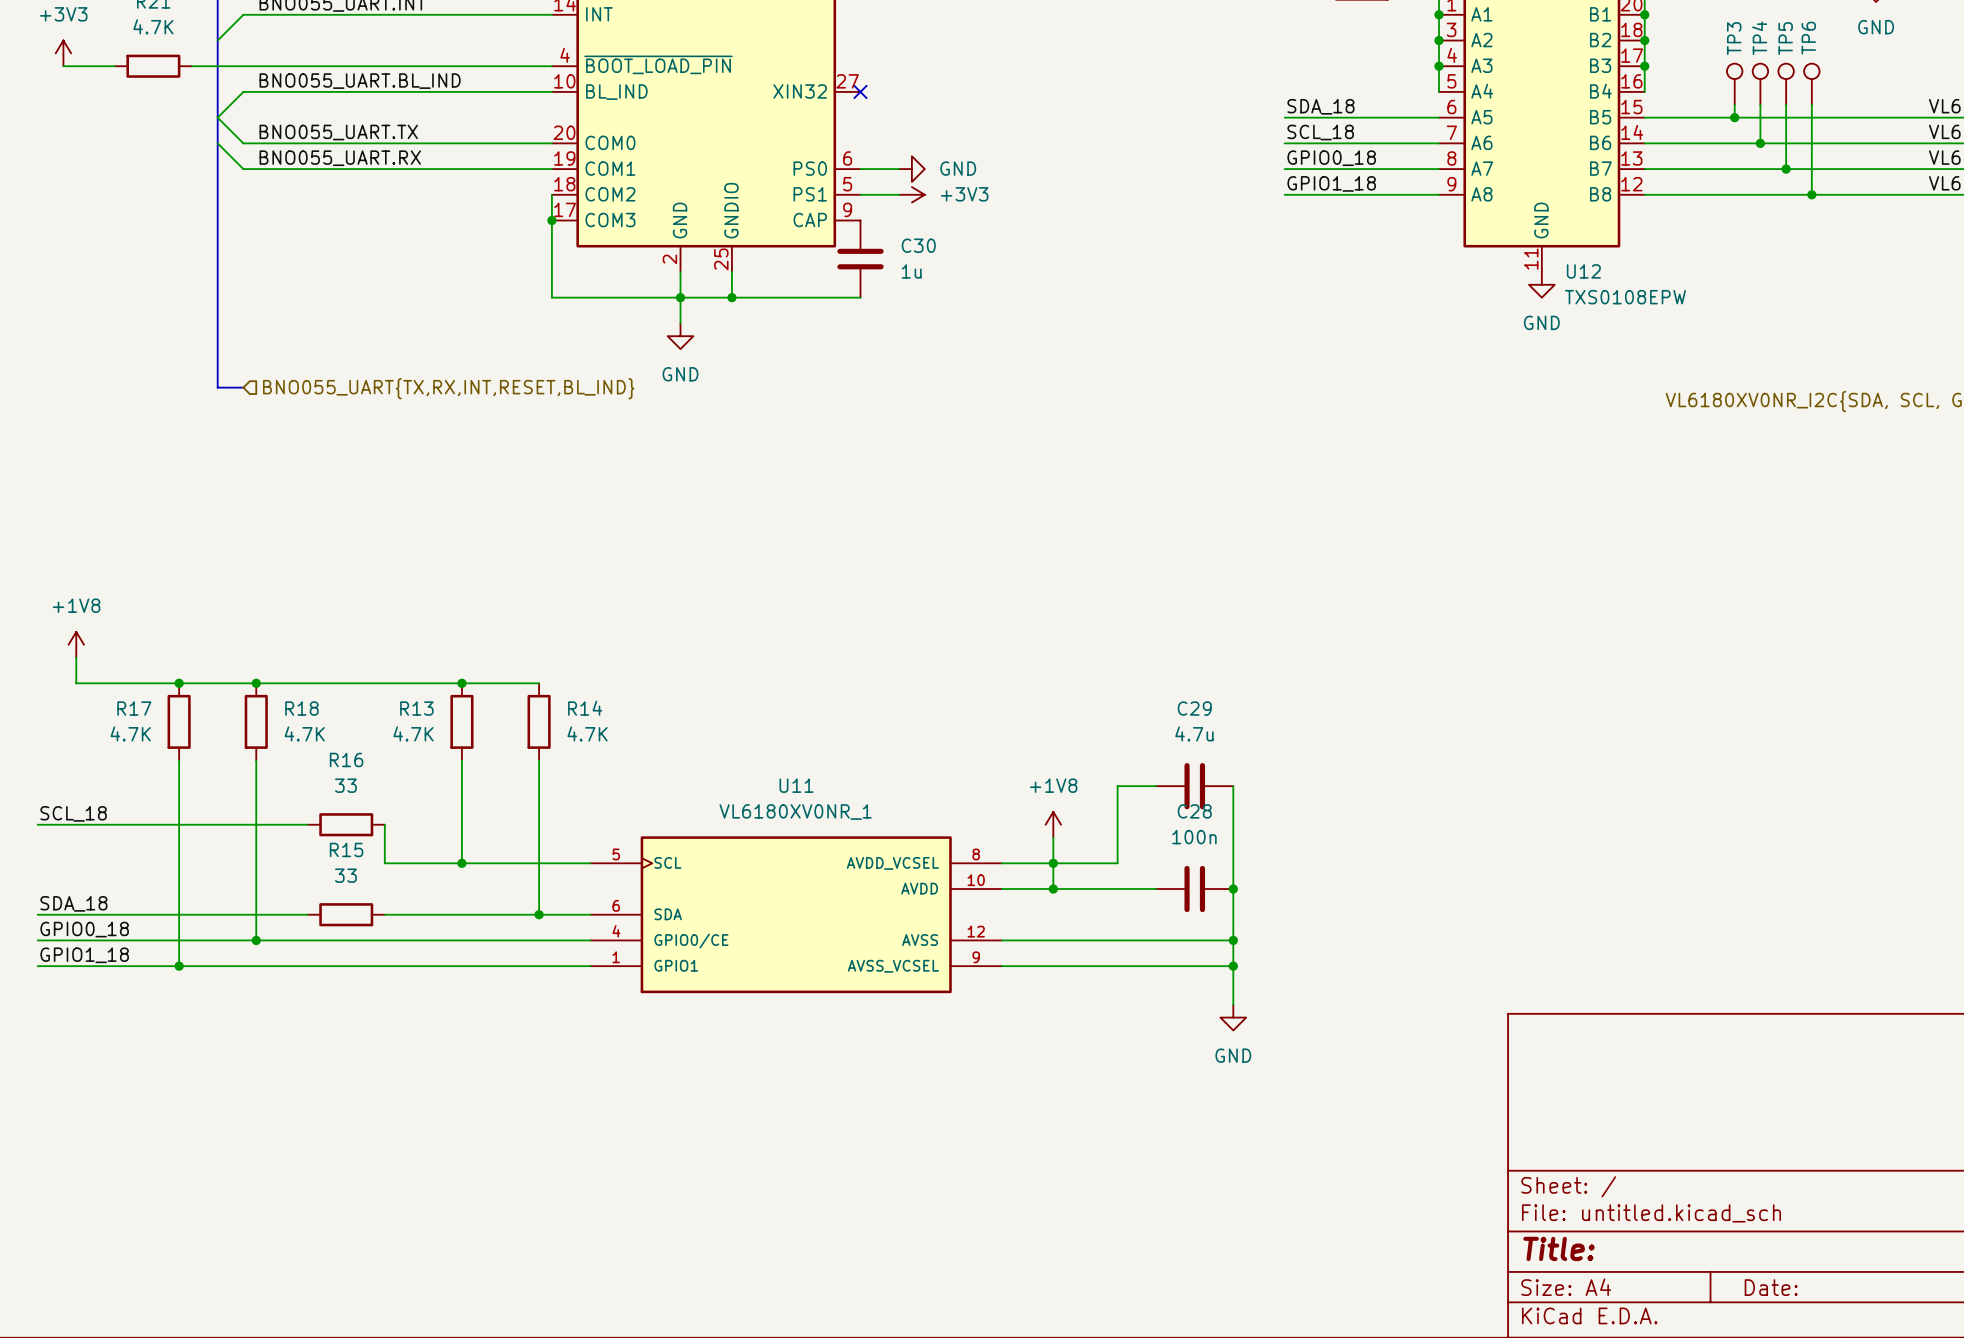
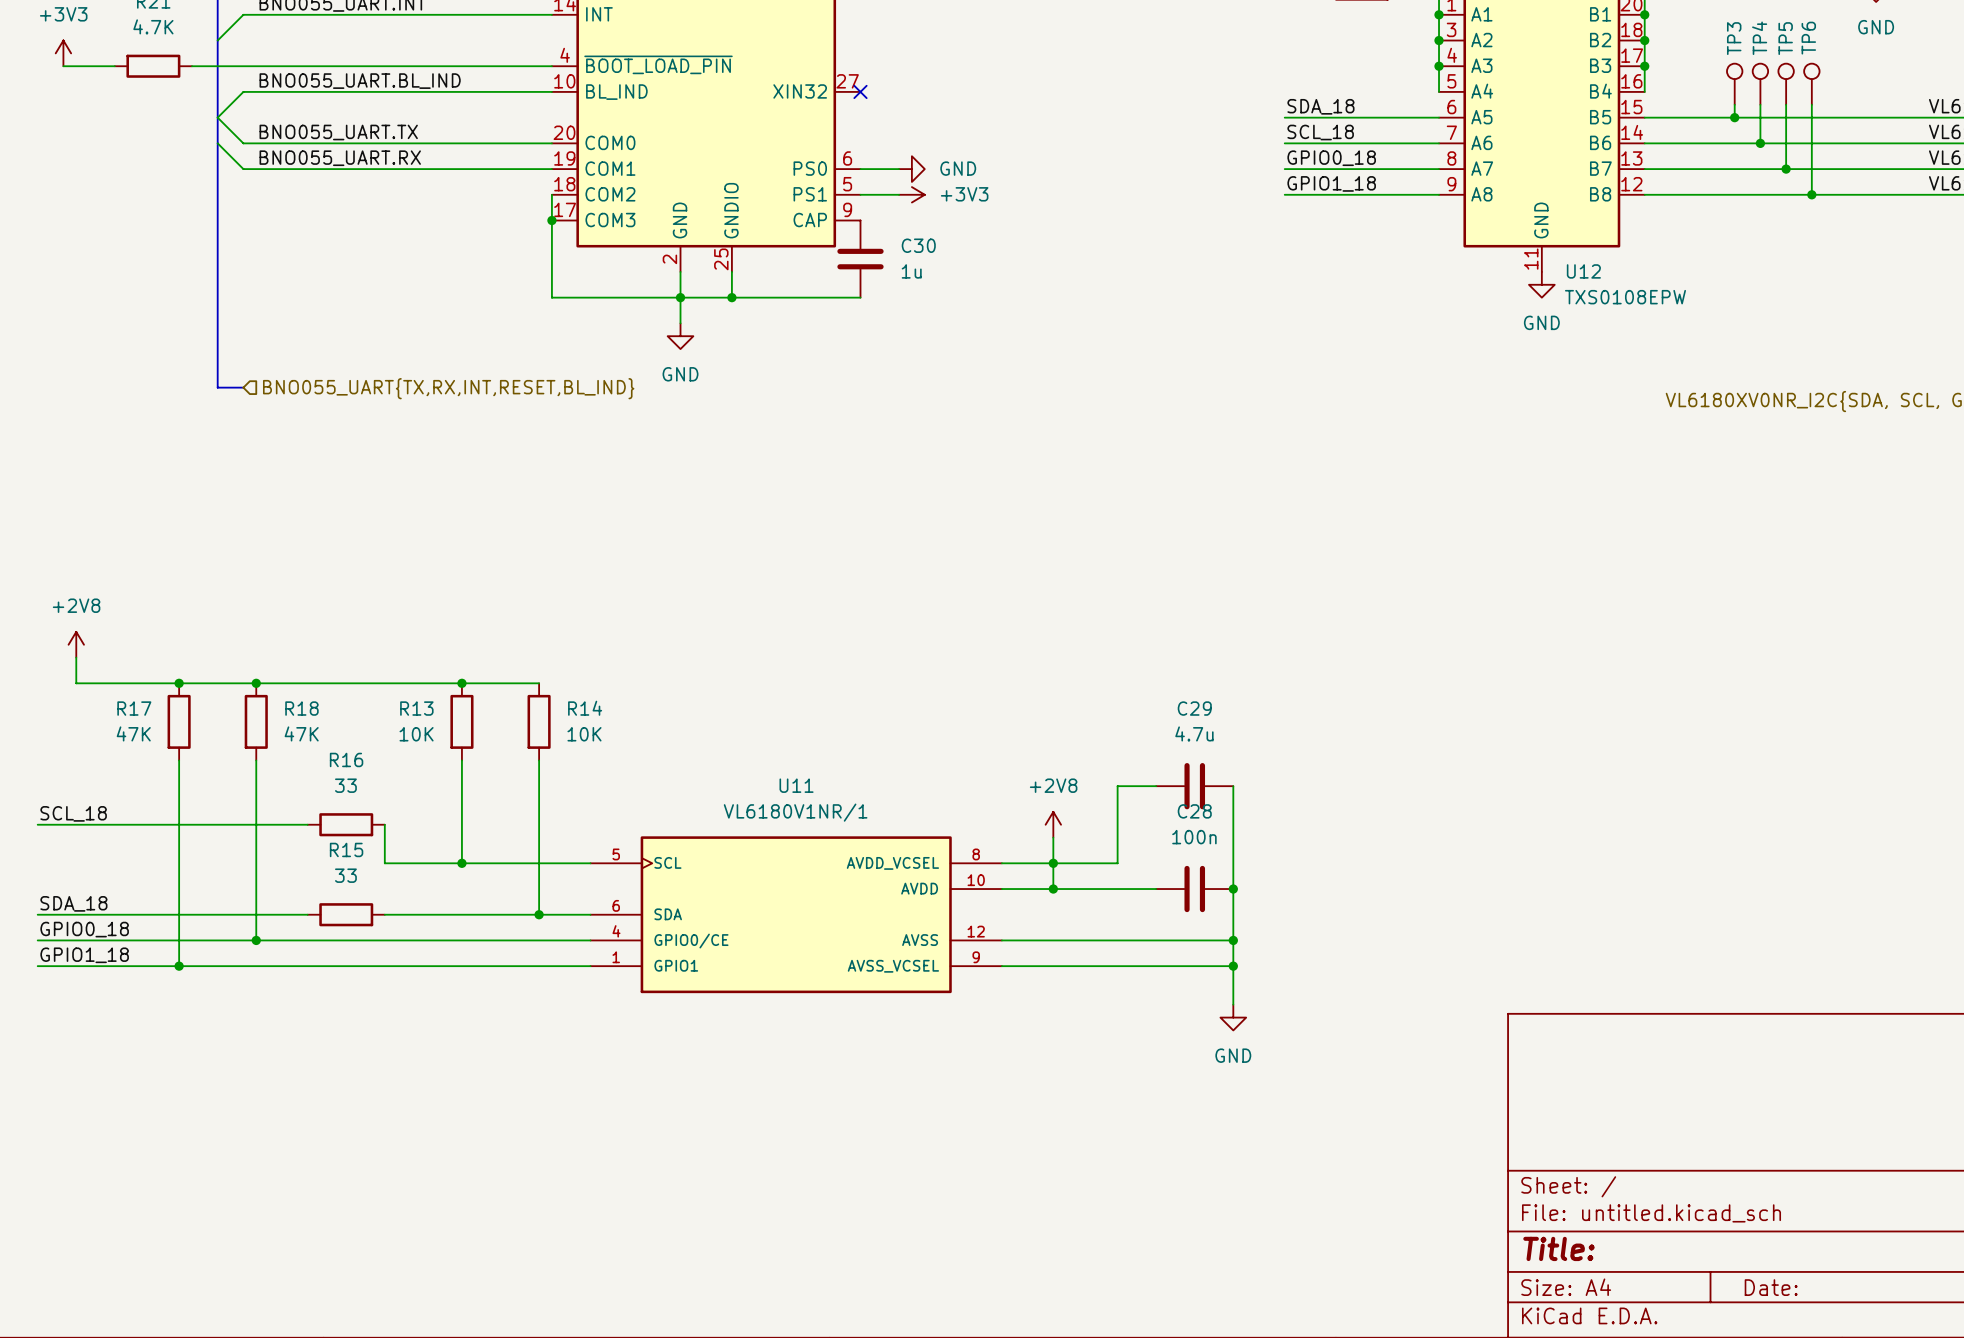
power symbol: +1V8 (76, 644) -> +2V8 (76, 644)
R17 value: 4.7K (130, 733) -> 47K (133, 733)
R18 value: 4.7K (304, 733) -> 47K (301, 733)
R13 value: 4.7K (413, 733) -> 10K (416, 734)
R14 value: 4.7K (587, 733) -> 10K (584, 734)
U11 value: VL6180XV0NR_1 (795, 812) -> VL6180V1NR/1 (795, 812)
power symbol: +1V8 (1053, 824) -> +2V8 (1053, 824)

